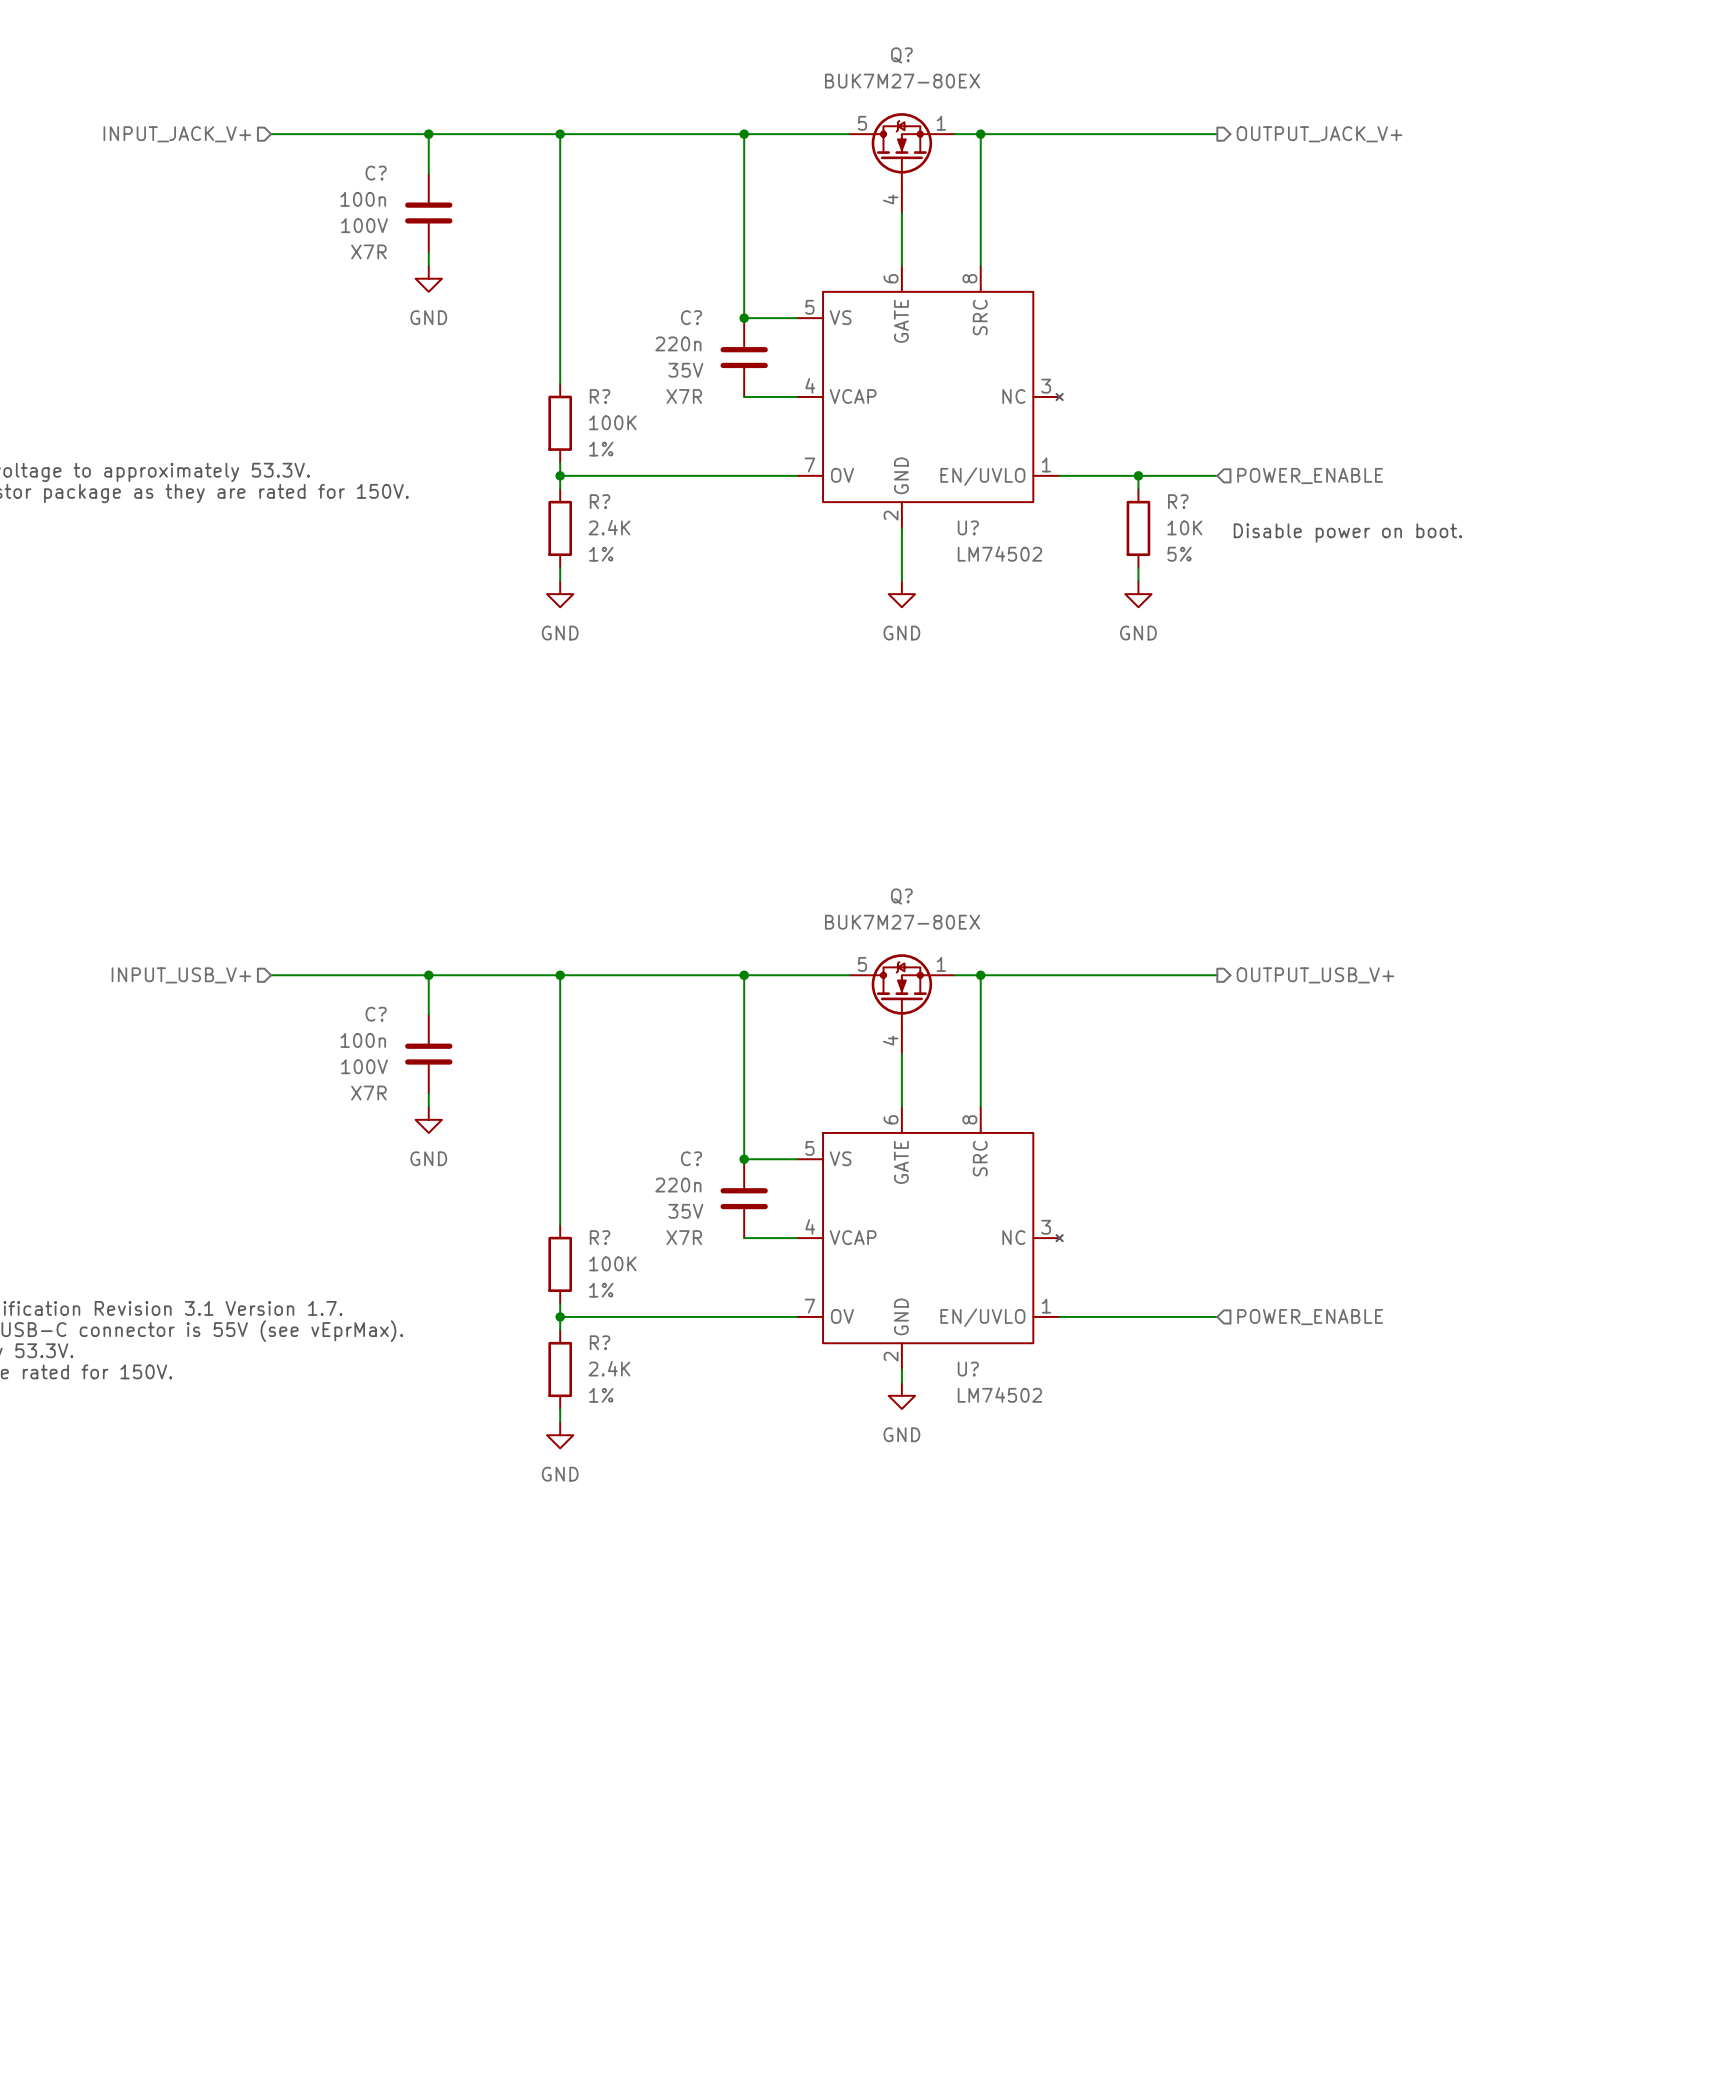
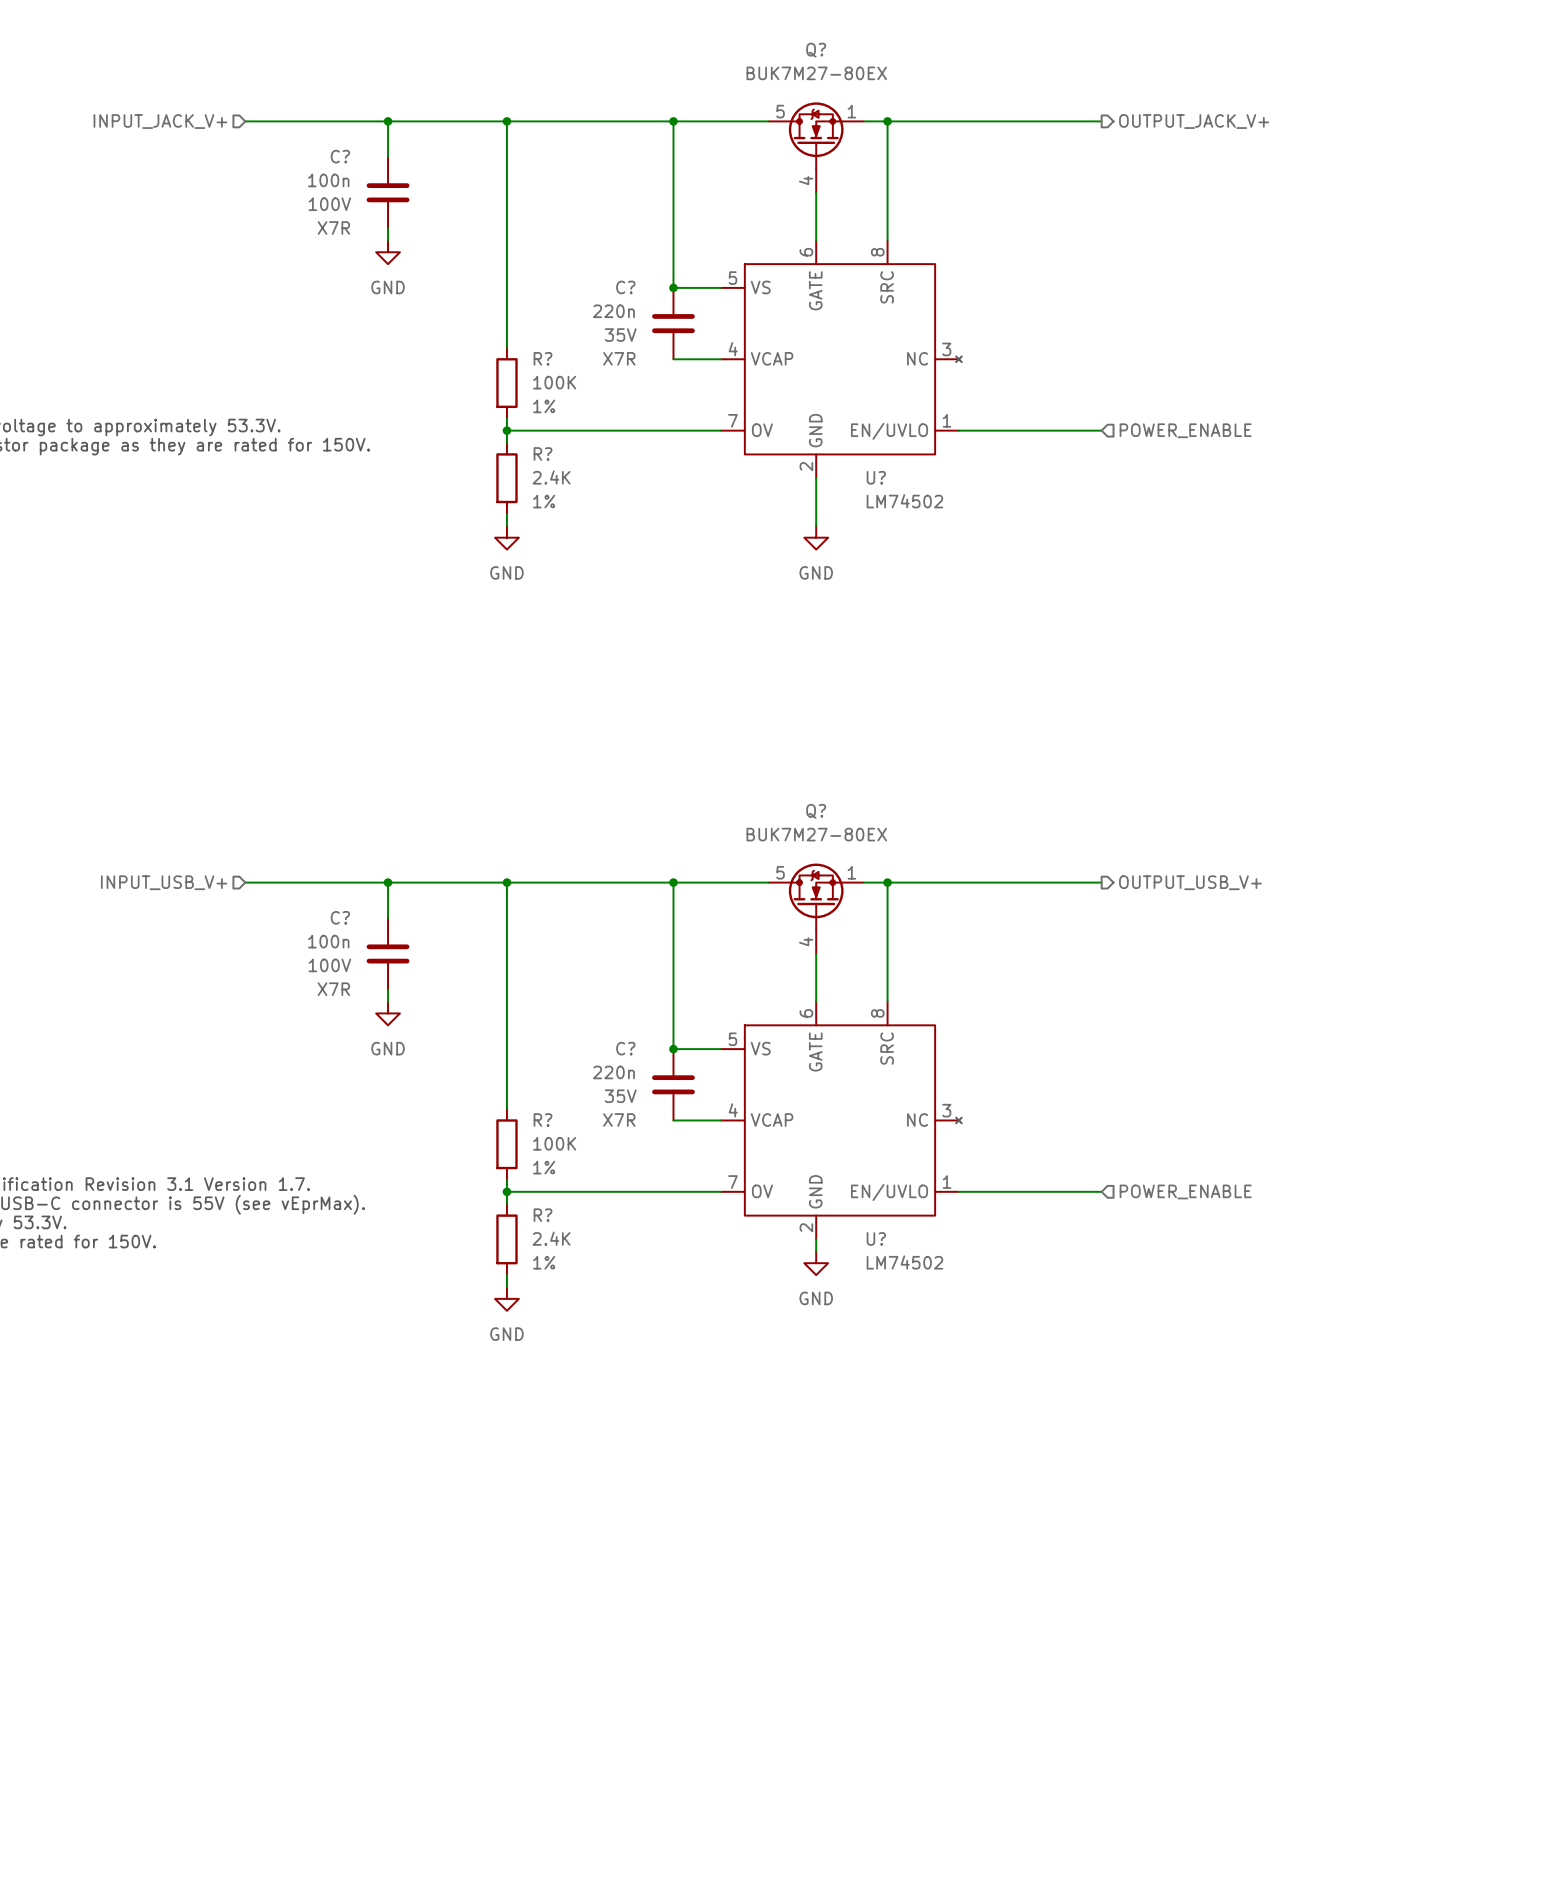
wire: (1138, 475) (1138, 488) -> none
junction: (1138, 475) -> none
R?: 10K (1138, 528) -> none
text: Disable power on boot. (1347, 532) -> none
wire: (1138, 567) (1138, 580) -> none
power symbol: GND (1138, 594) -> none

